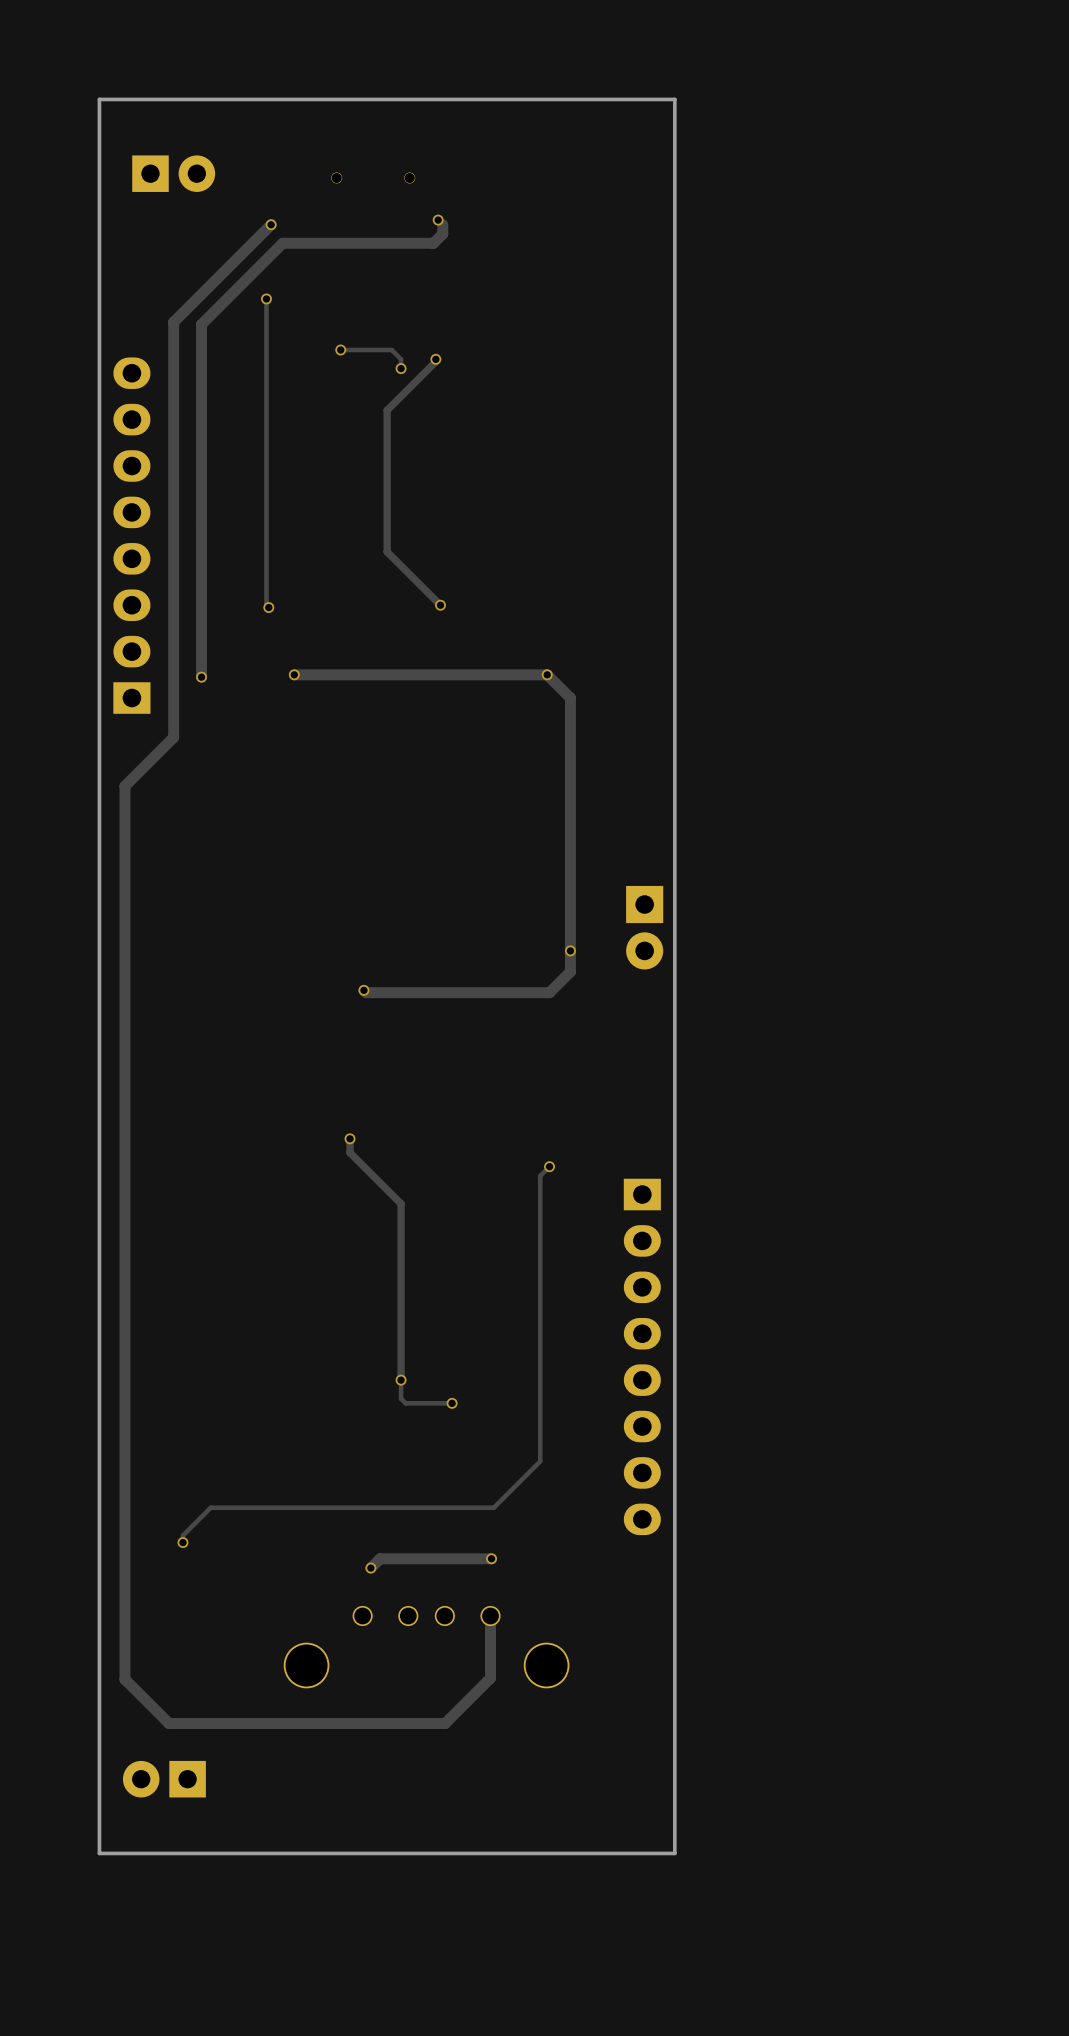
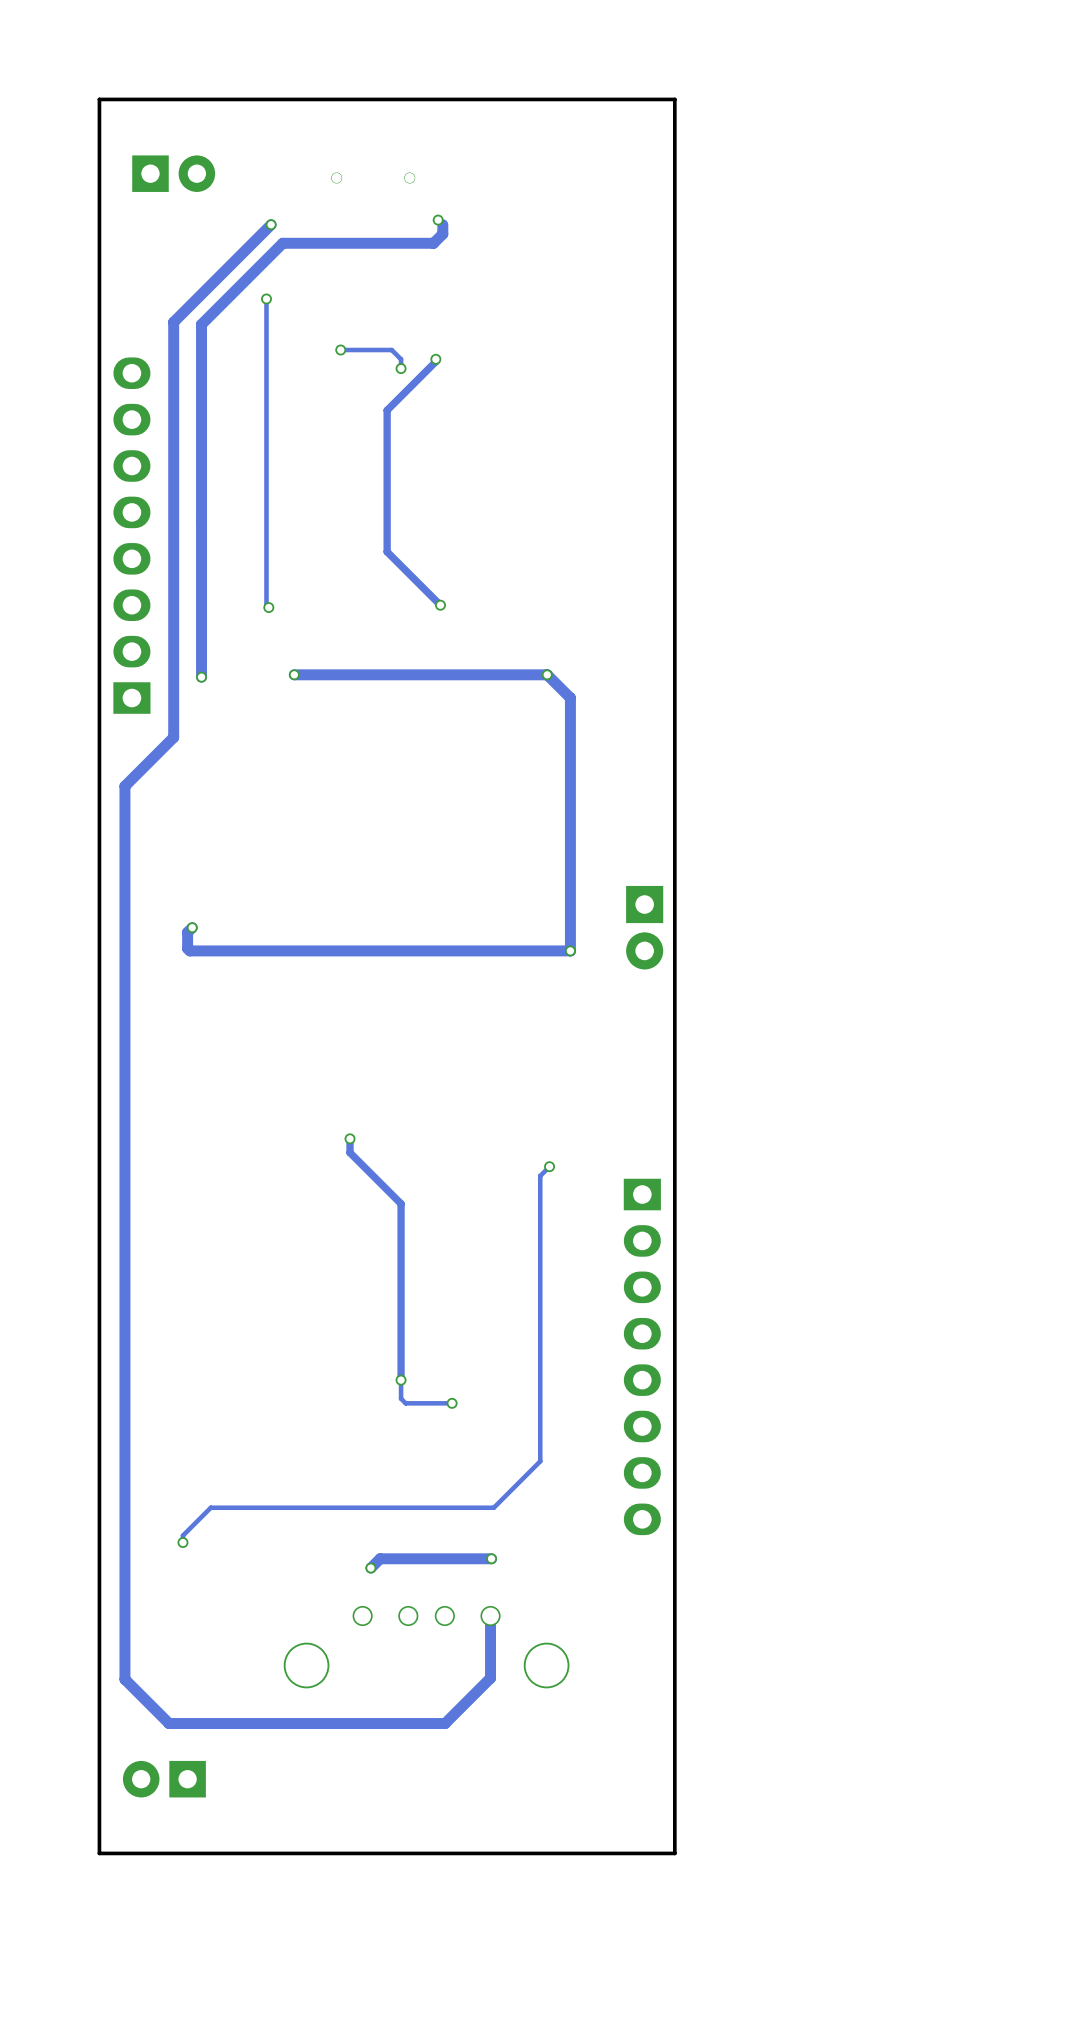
via: none -> (192, 927)
track: (570, 950) (570, 971) (549, 992) (366, 992) (363, 990) -> (570, 950) (189, 950) (187, 948) (187, 932) (192, 927)
via: (363, 990) -> none

